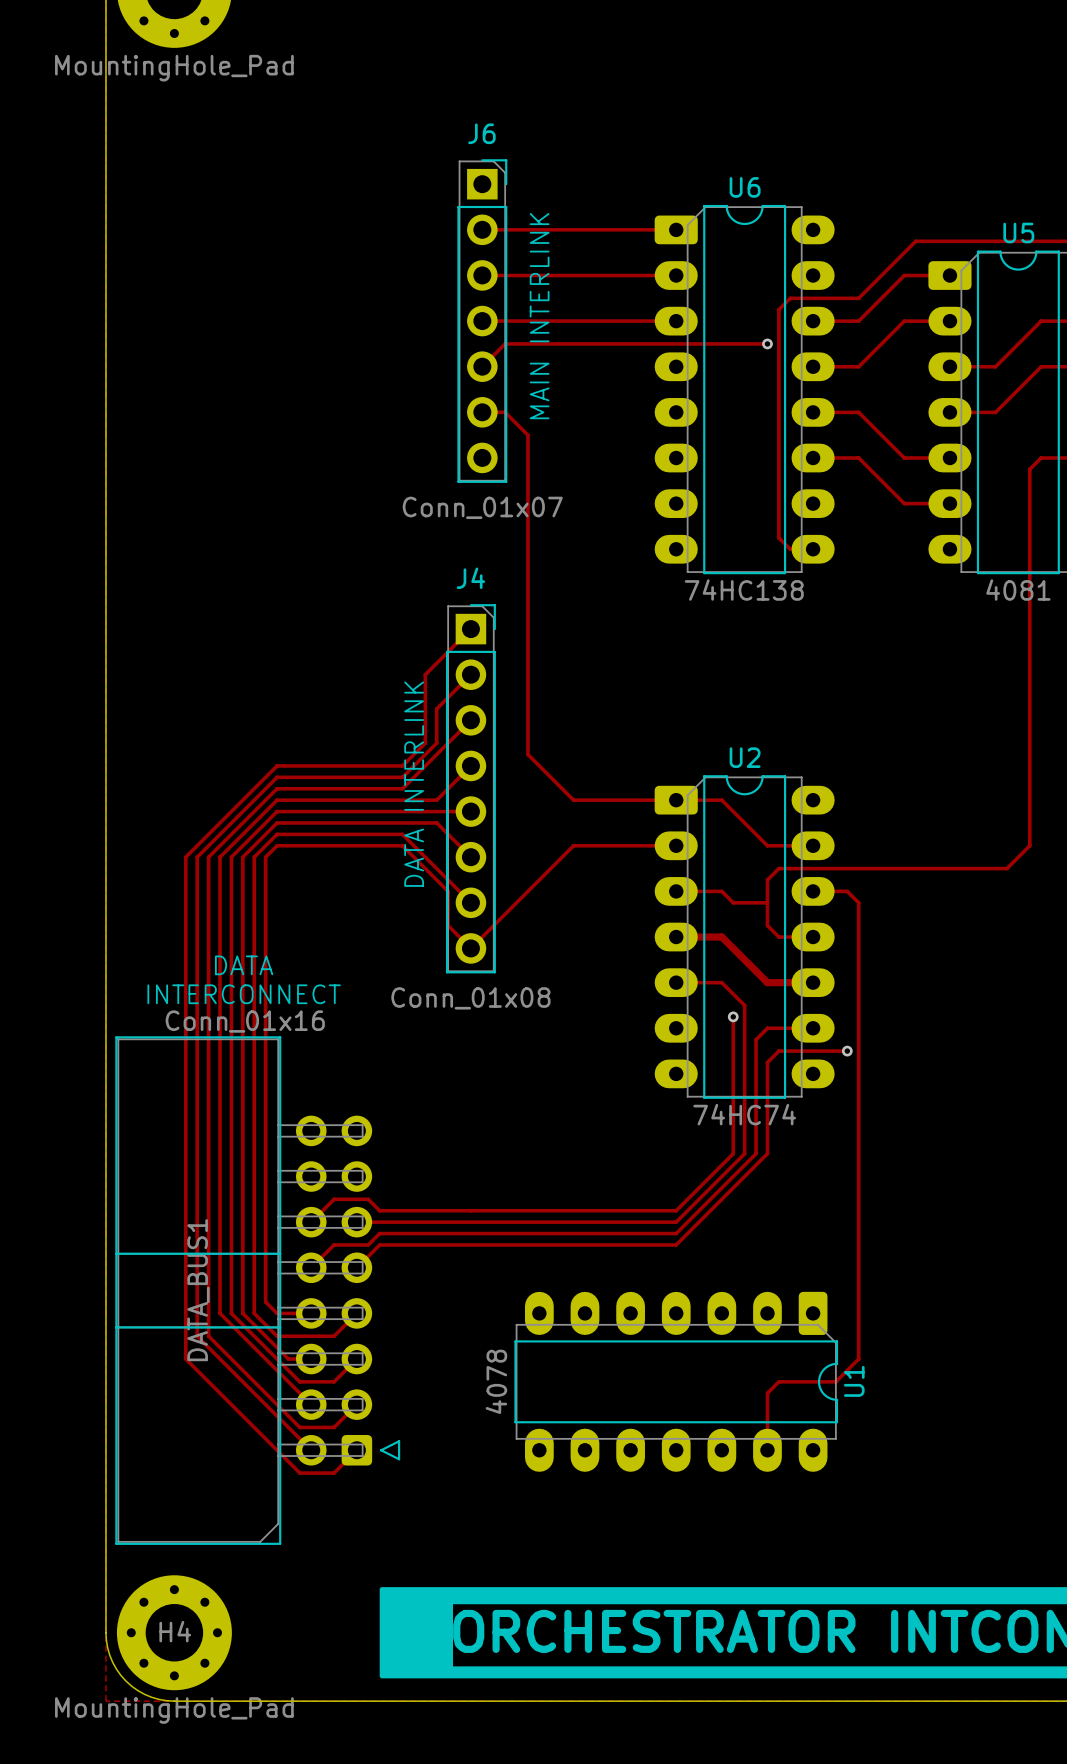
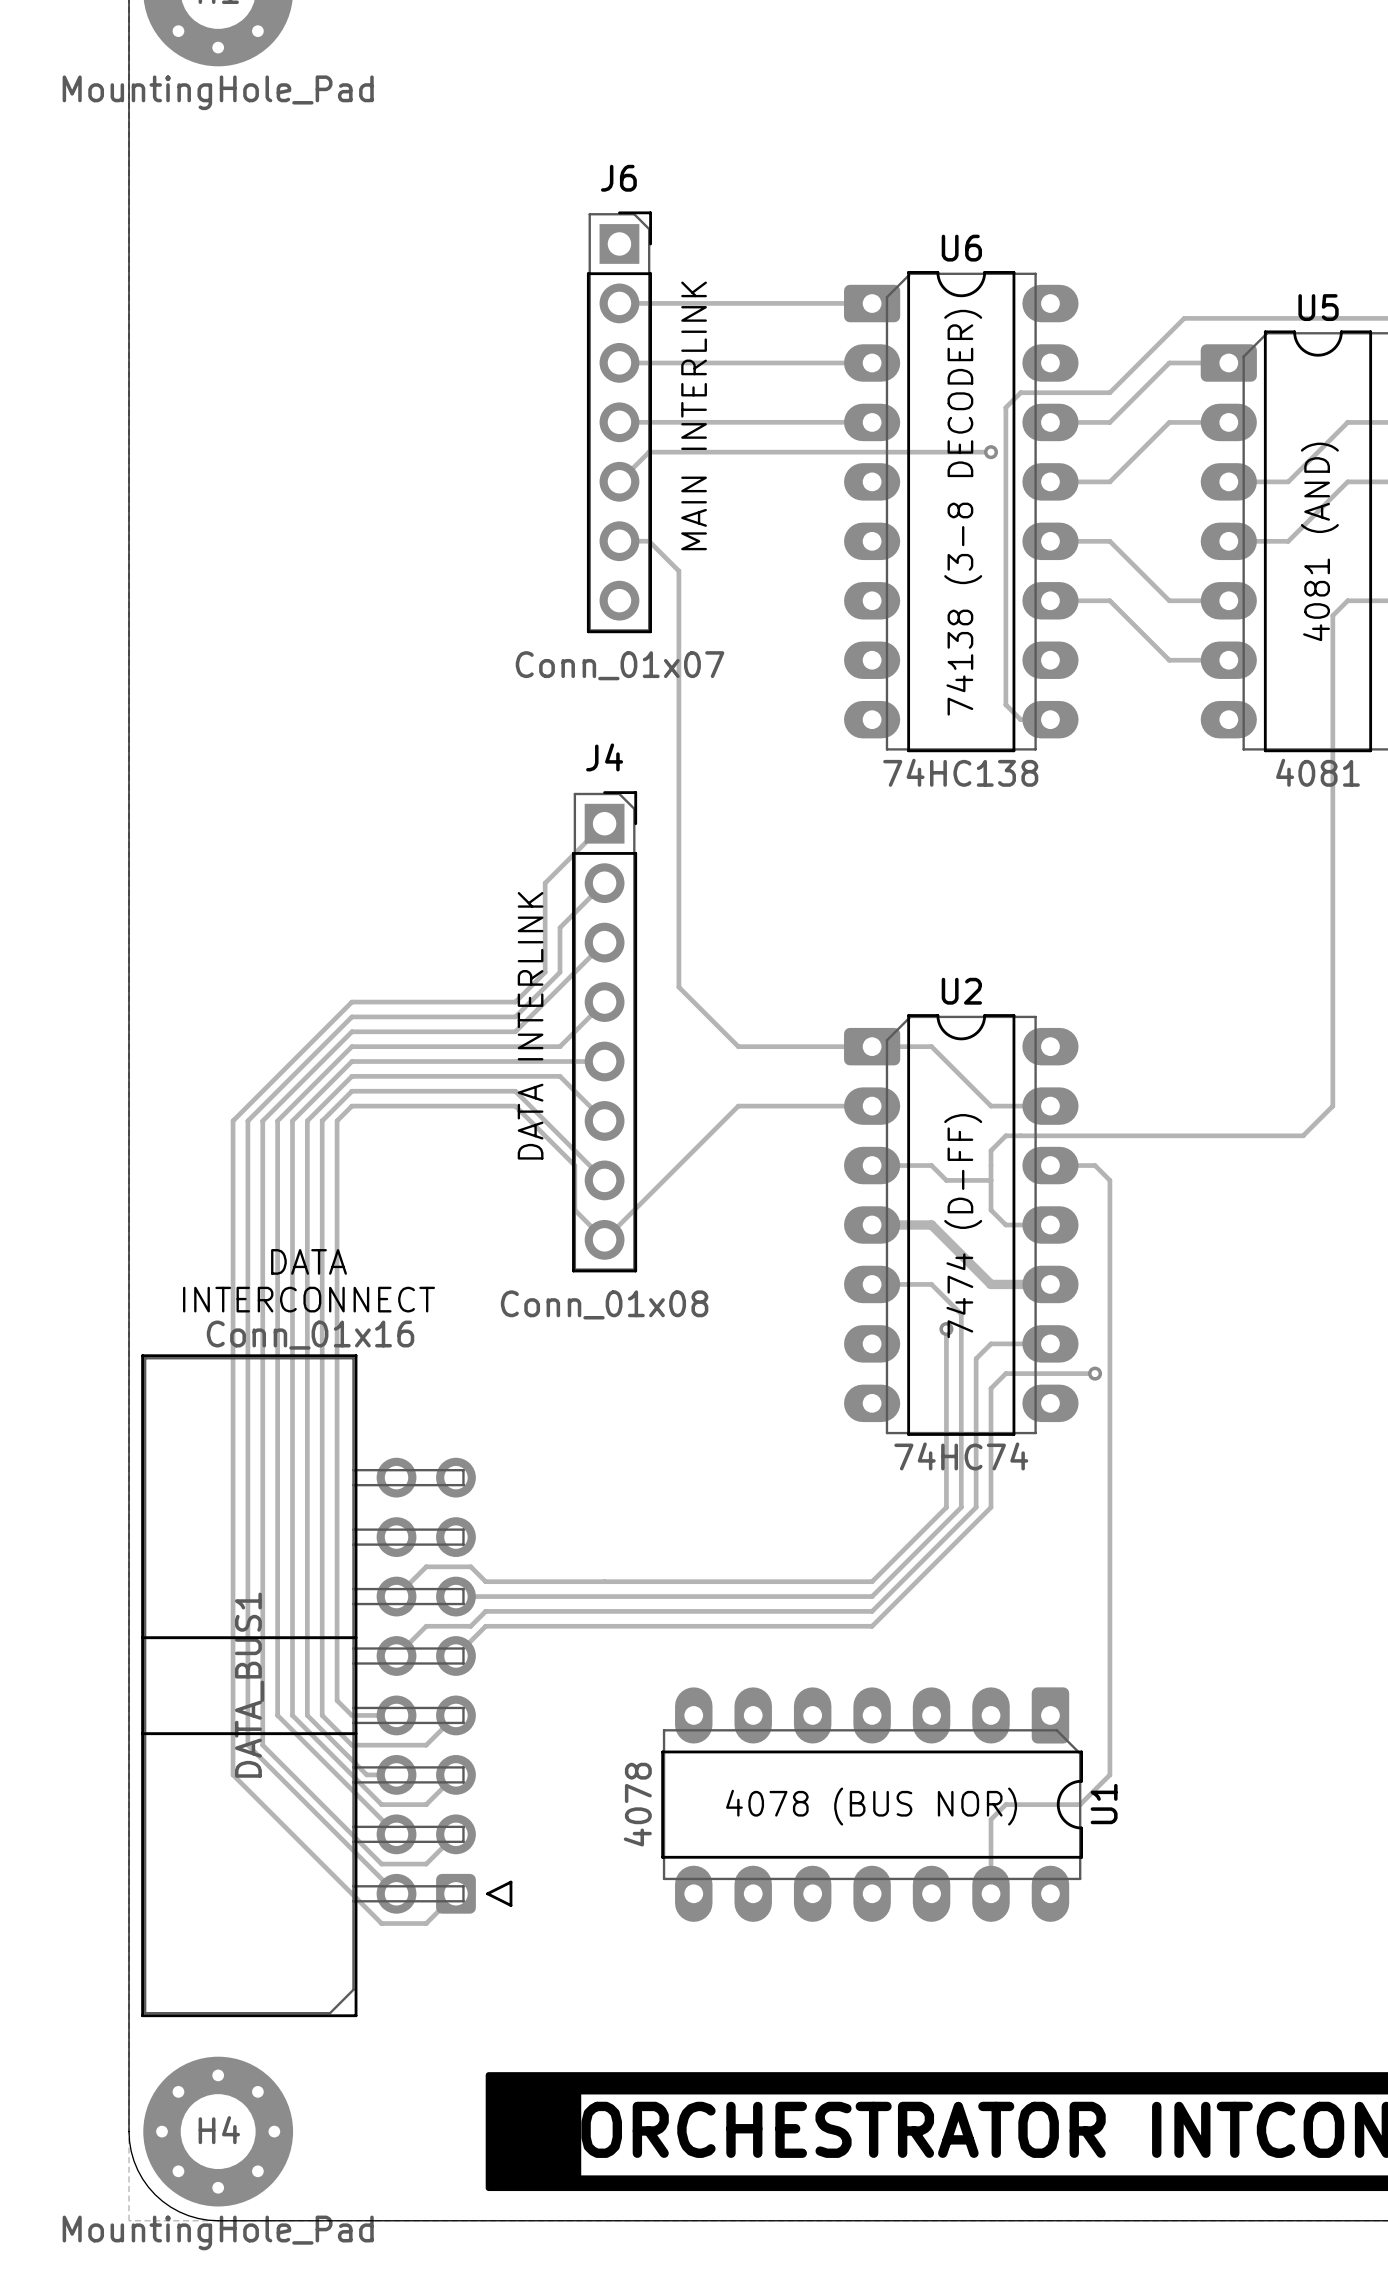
text: none -> 74138 (3-8 DECODER) (963, 512)
text: none -> 4081 (AND) (1319, 541)
text: none -> 7474 (D-FF) (963, 1226)
text: none -> 4078 (BUS NOR) (871, 1806)

